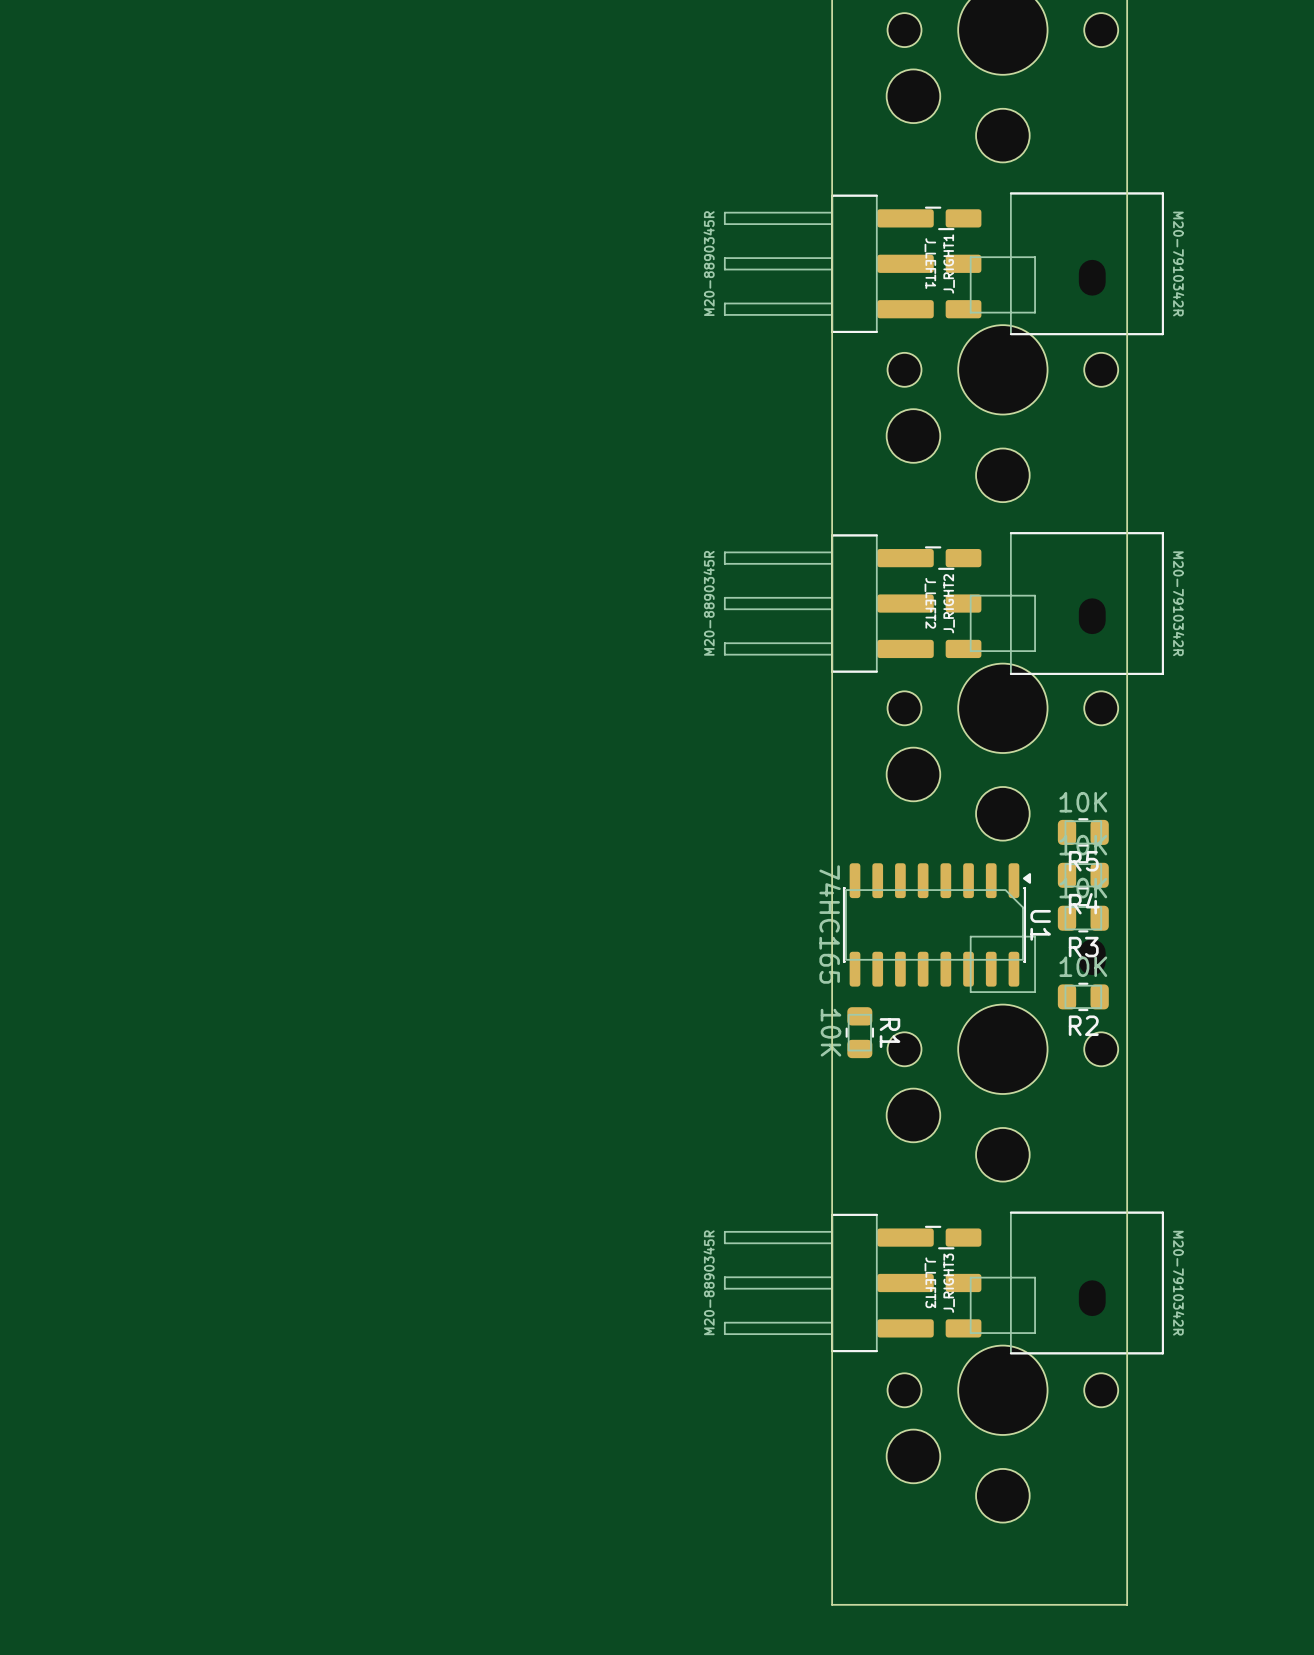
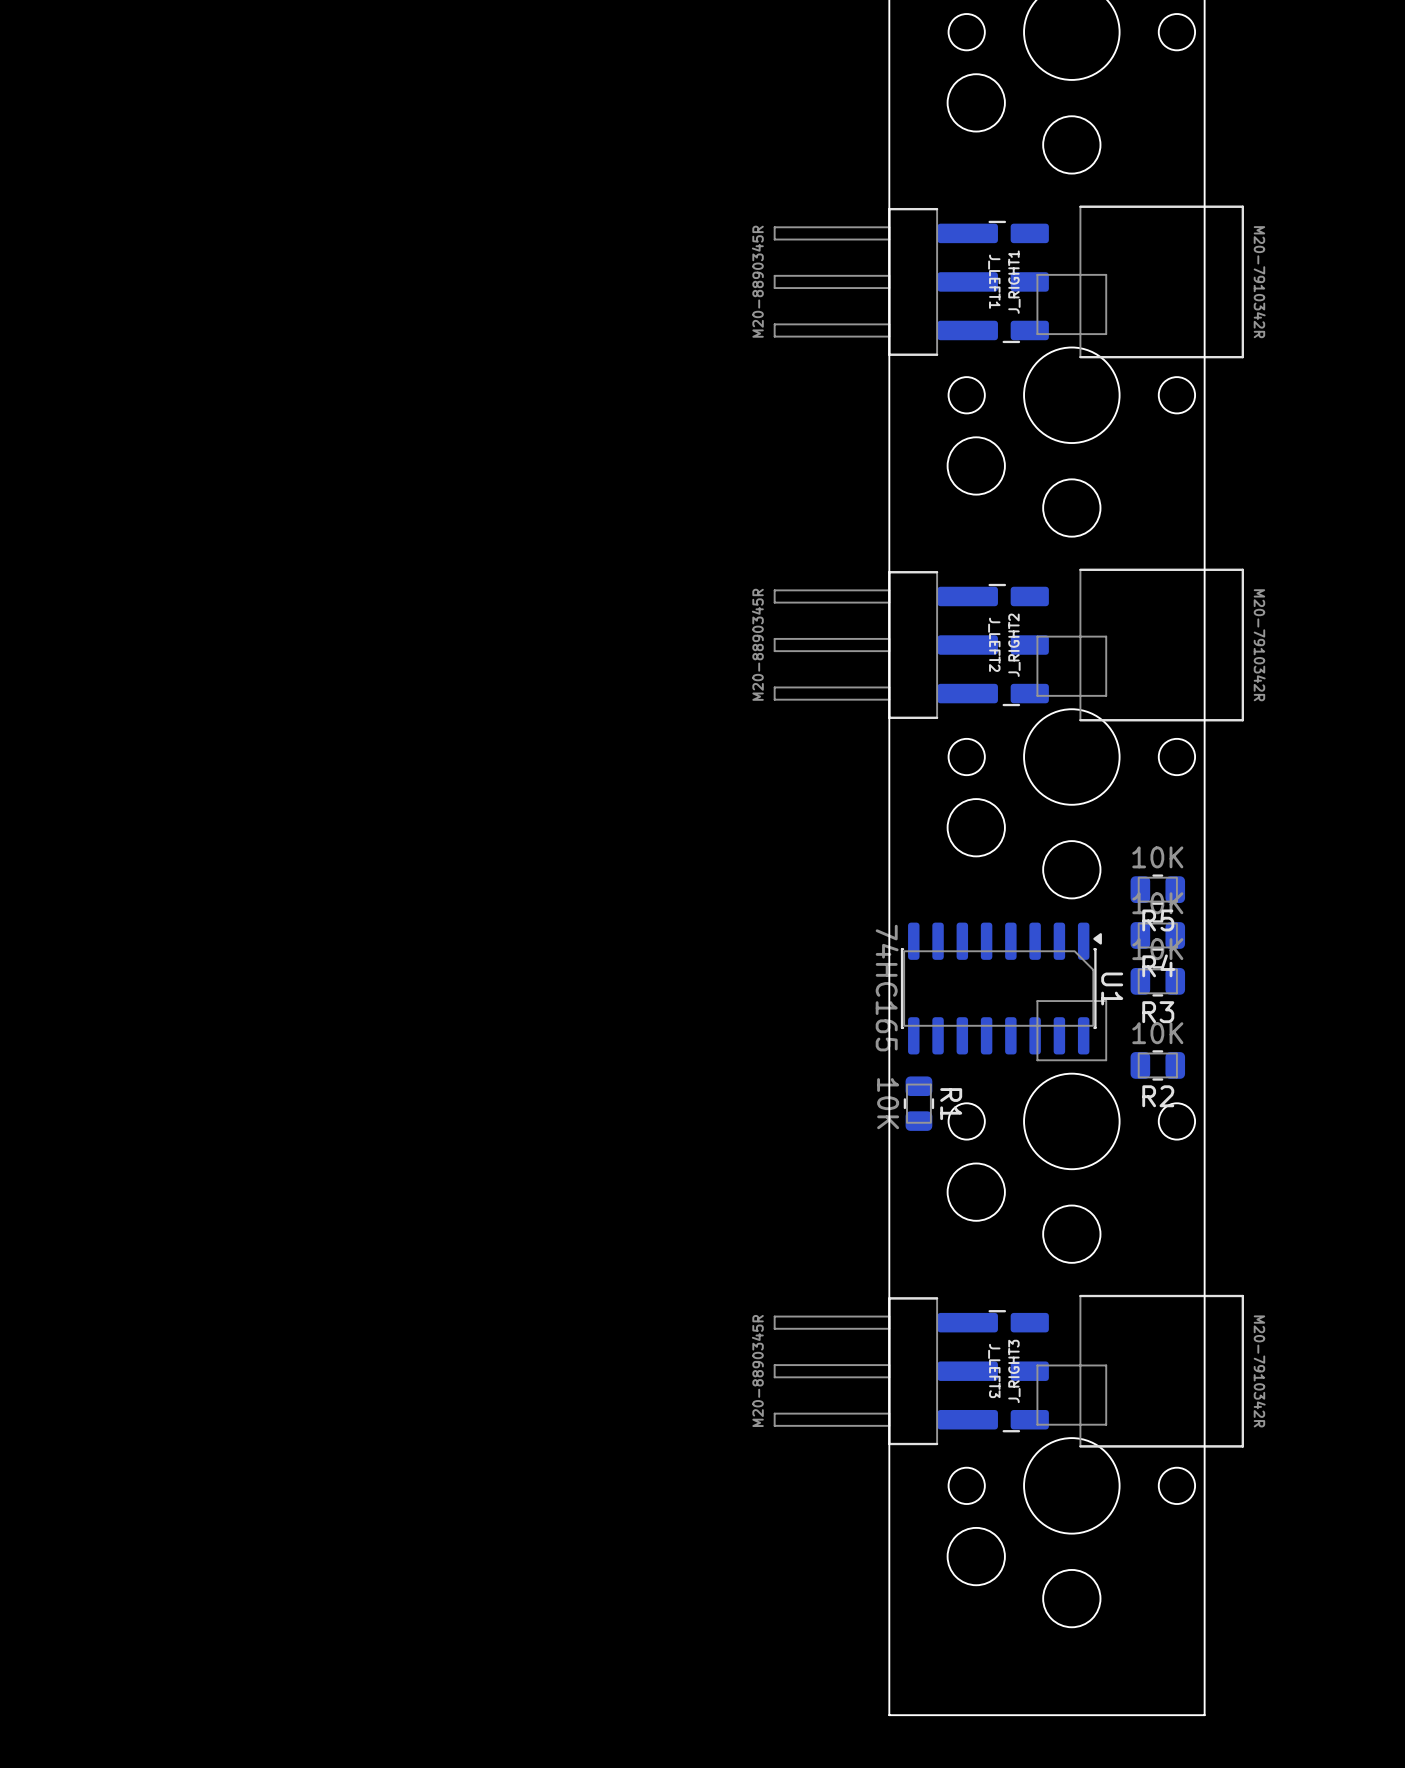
J_RIGHT1 footprint: [723, 194, 955, 333] -> [773, 207, 1021, 356]
J_RIGHT2 footprint: [723, 534, 955, 673] -> [773, 571, 1021, 719]
J_RIGHT3 footprint: [723, 1213, 955, 1353] -> [773, 1297, 1021, 1446]

